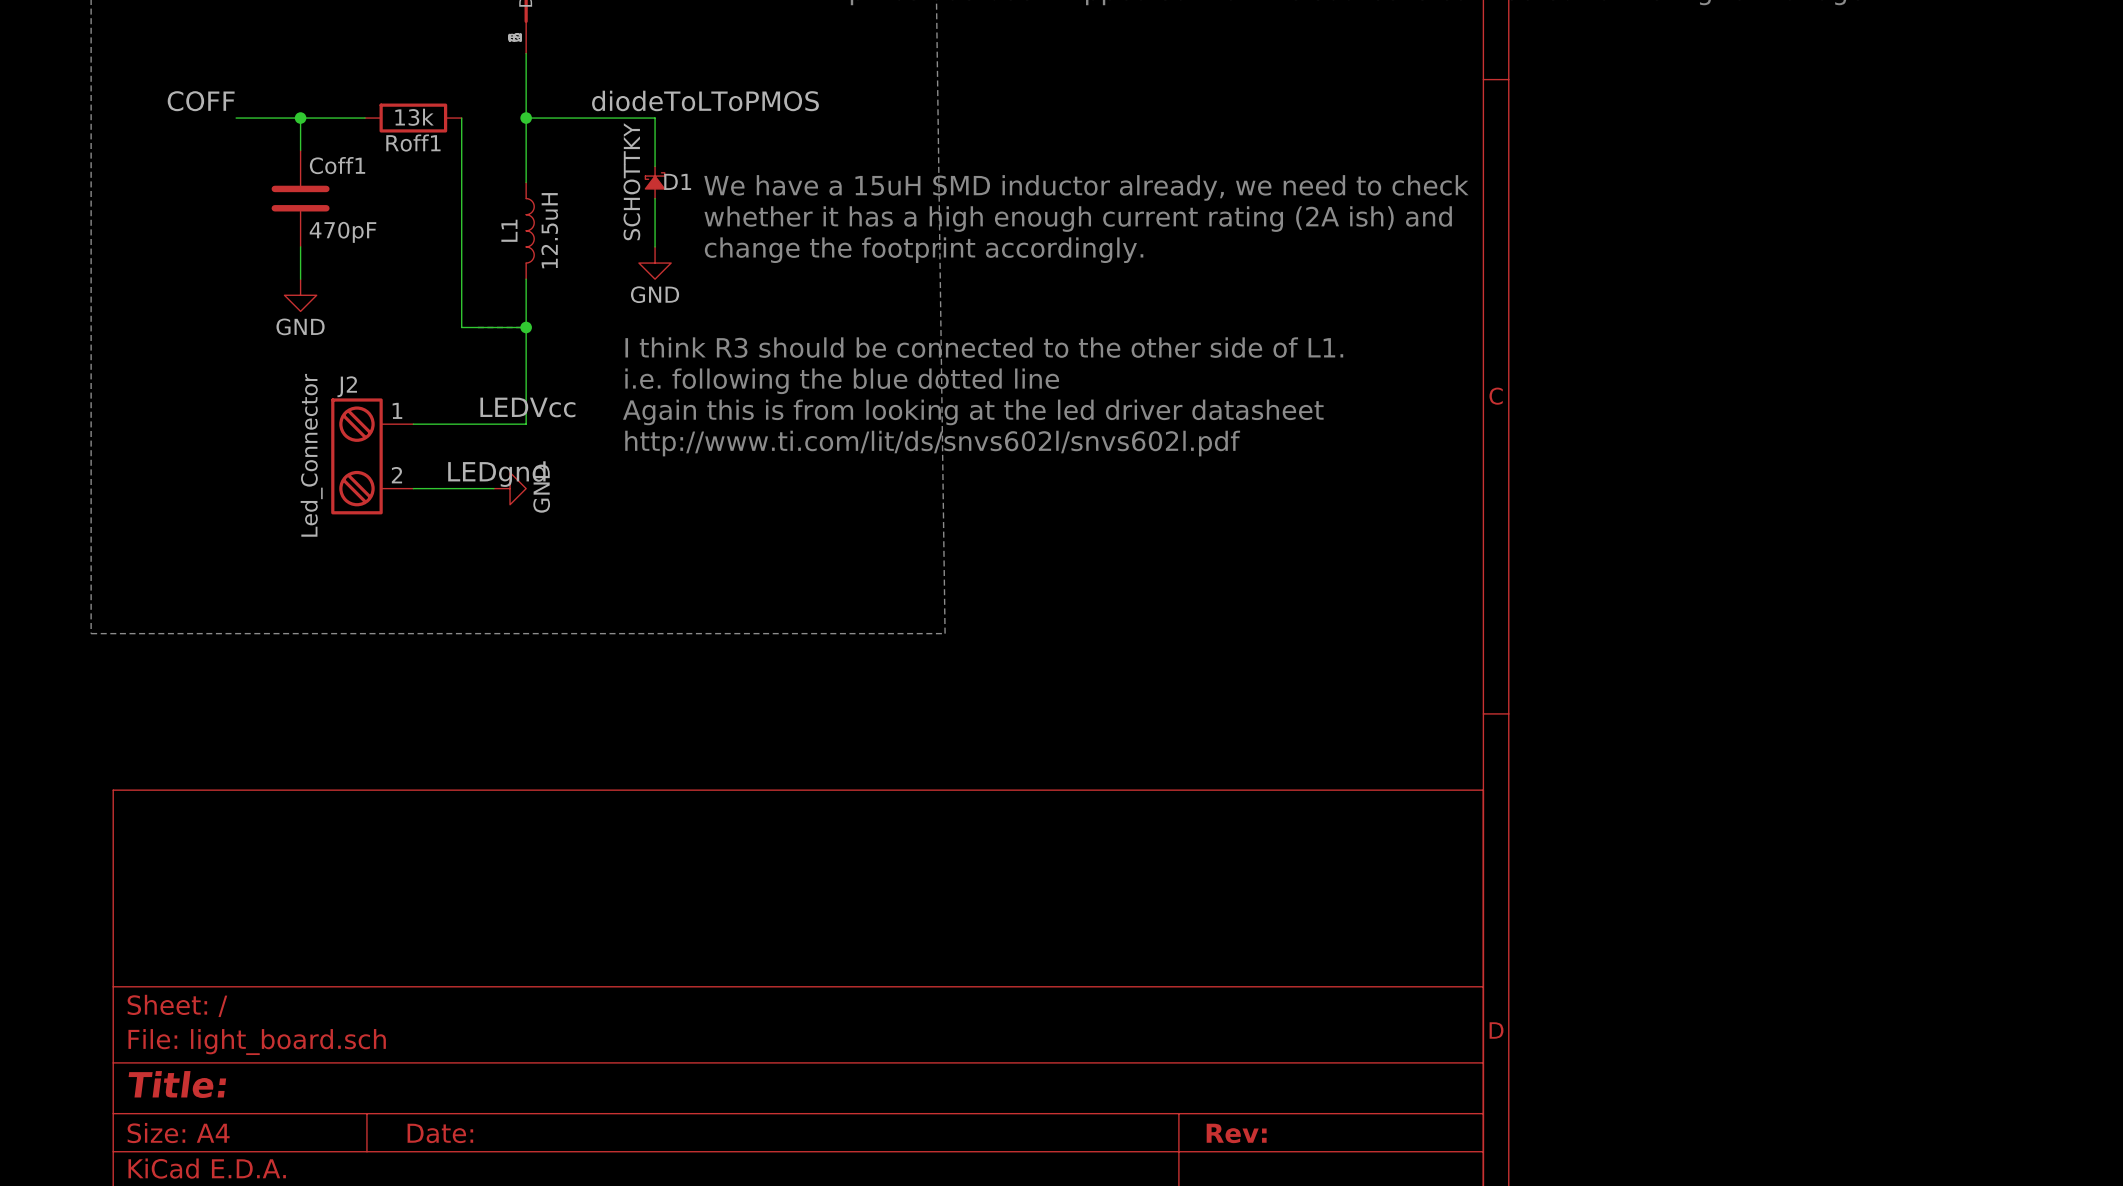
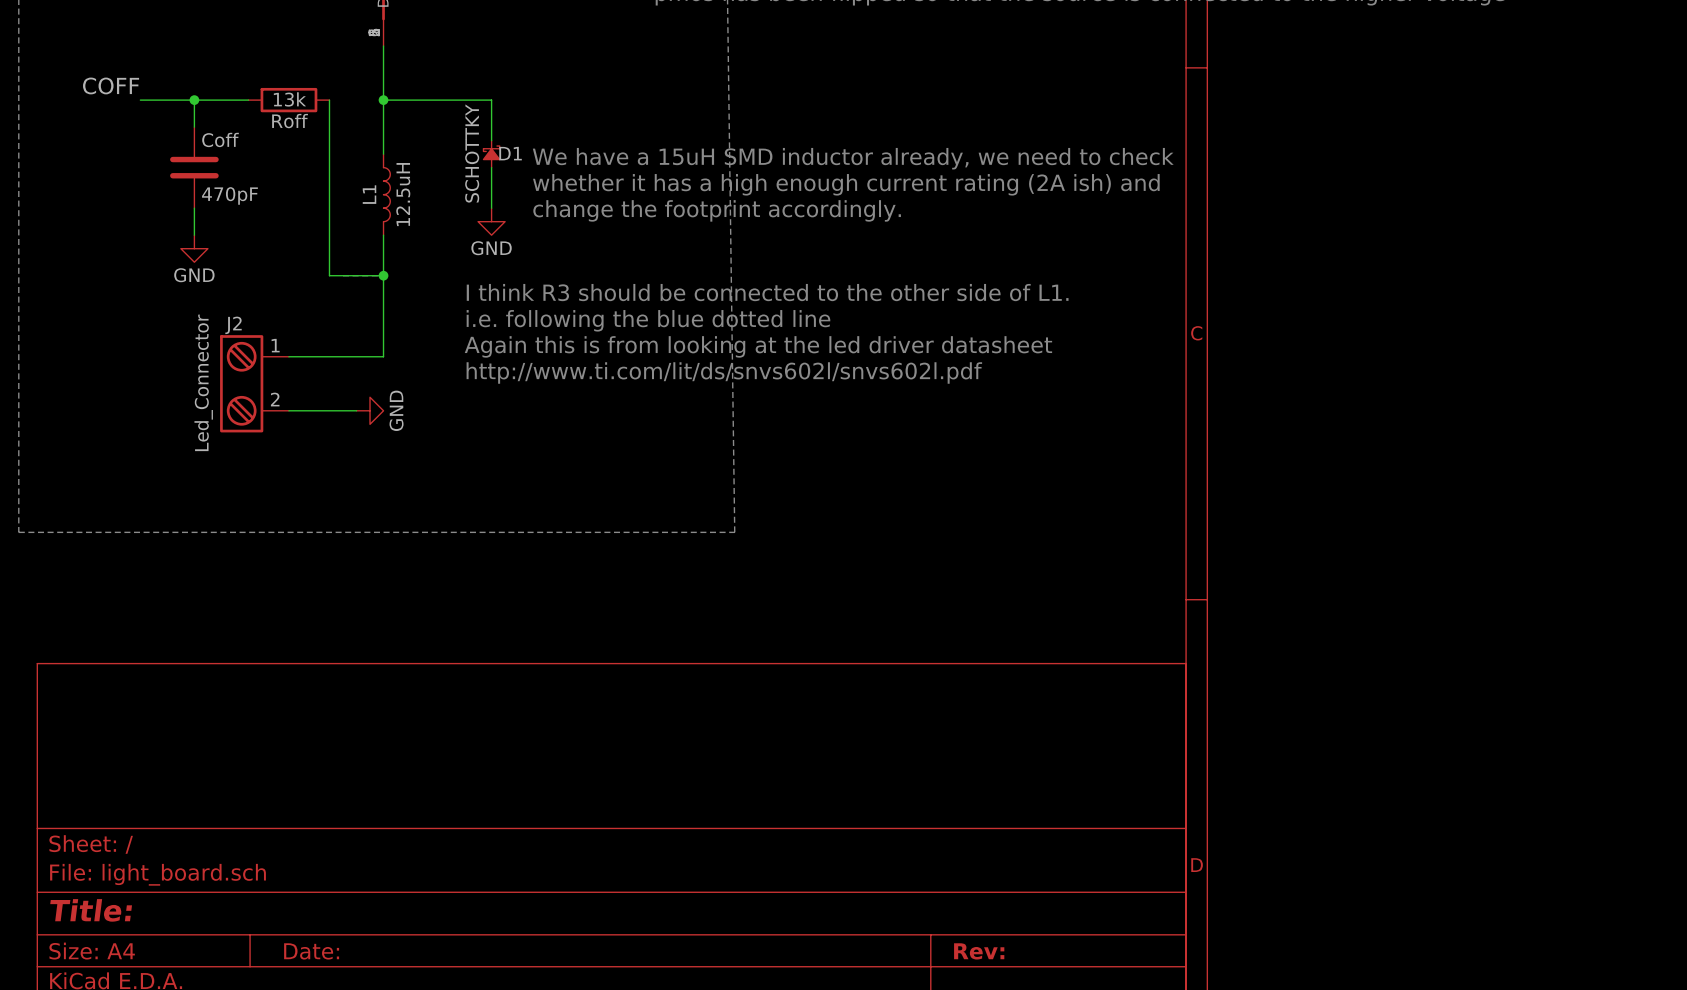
label: diodeToLToPMOS (705, 100) -> none
Roff1 name: Roff1 (413, 143) -> Roff (290, 121)
Coff1 name: Coff1 (337, 165) -> Coff (220, 139)
label: LEDVcc (527, 407) -> none
label: LEDgnd (496, 474) -> none

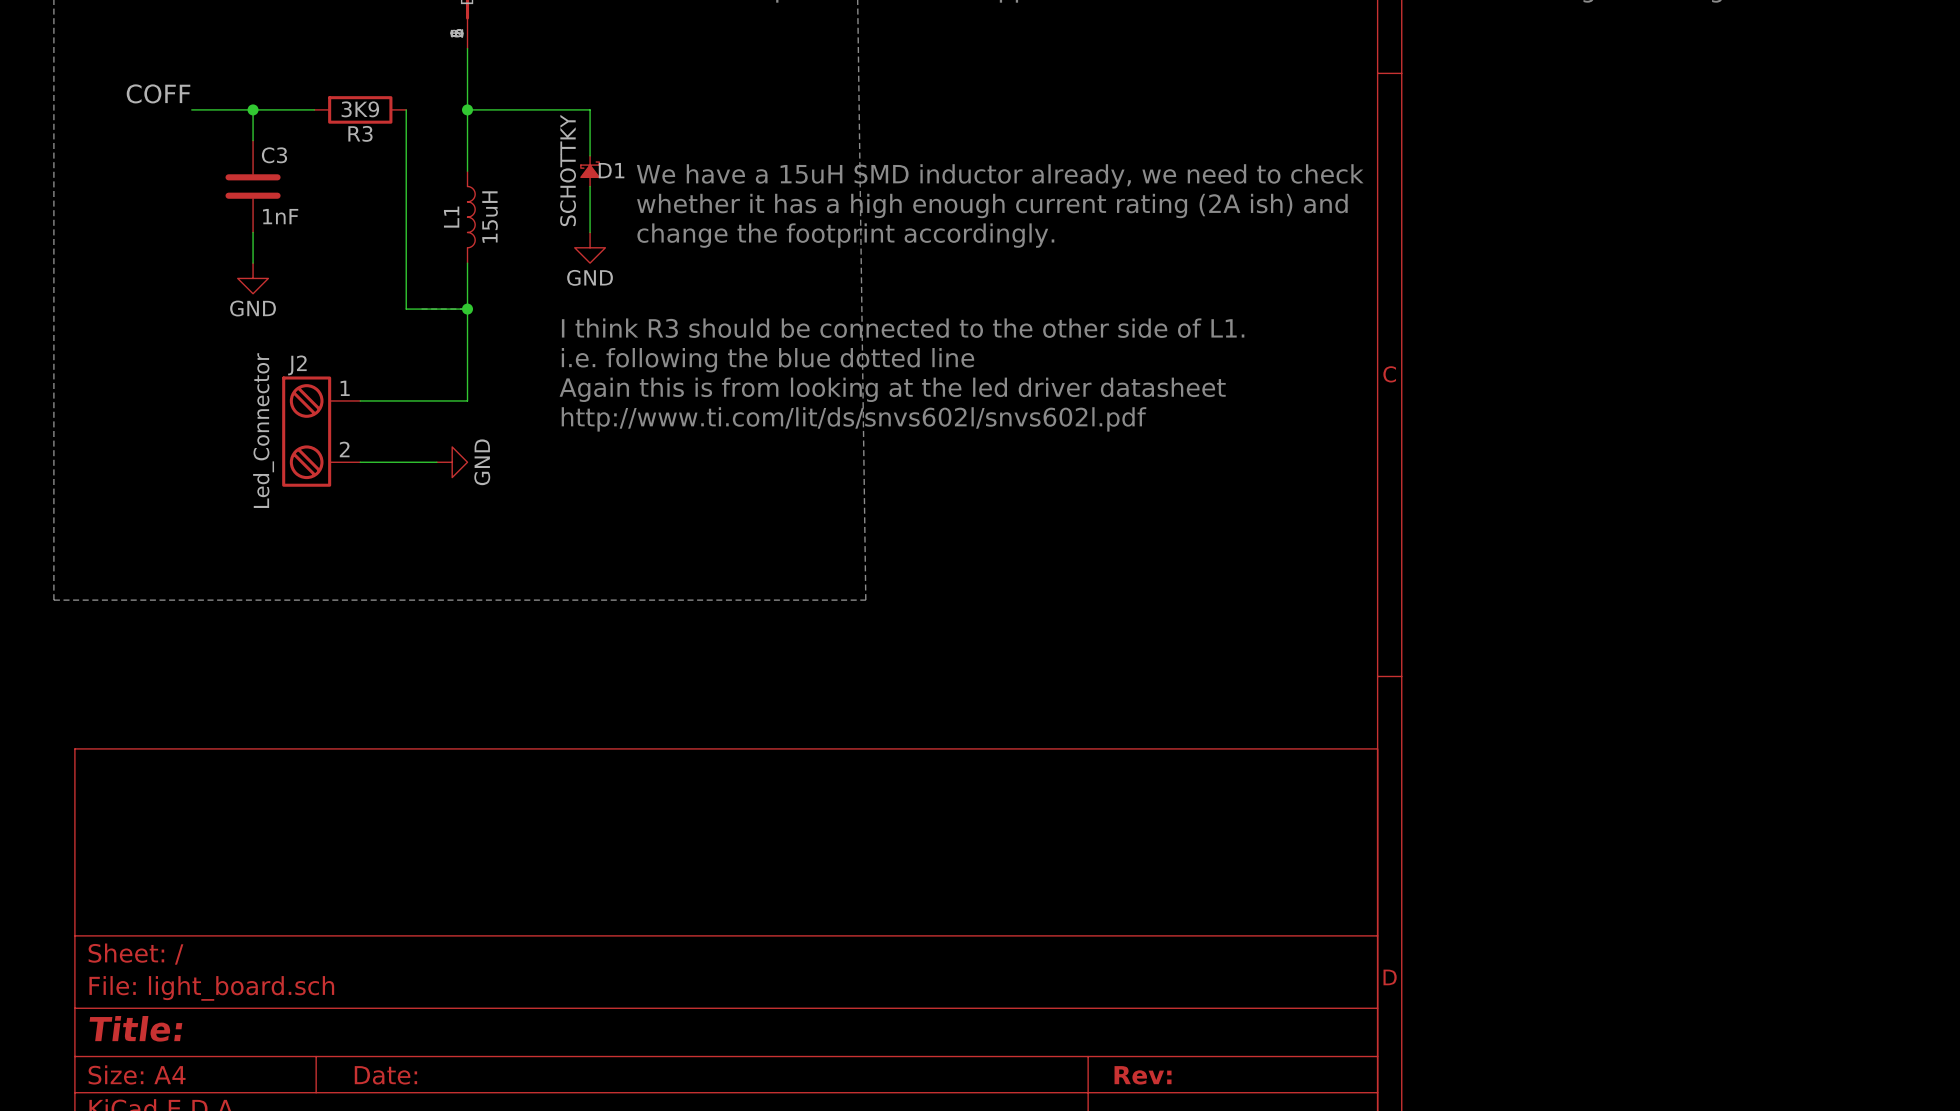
Roff value: 13k (289, 99) -> 3K9 (360, 109)
Roff name: Roff (290, 121) -> R3 (360, 133)
Coff name: Coff (220, 139) -> C3 (274, 155)
L1 value: 12.5uH (403, 194) -> 15uH (490, 217)
Coff value: 470pF (229, 195) -> 1nF (280, 216)

